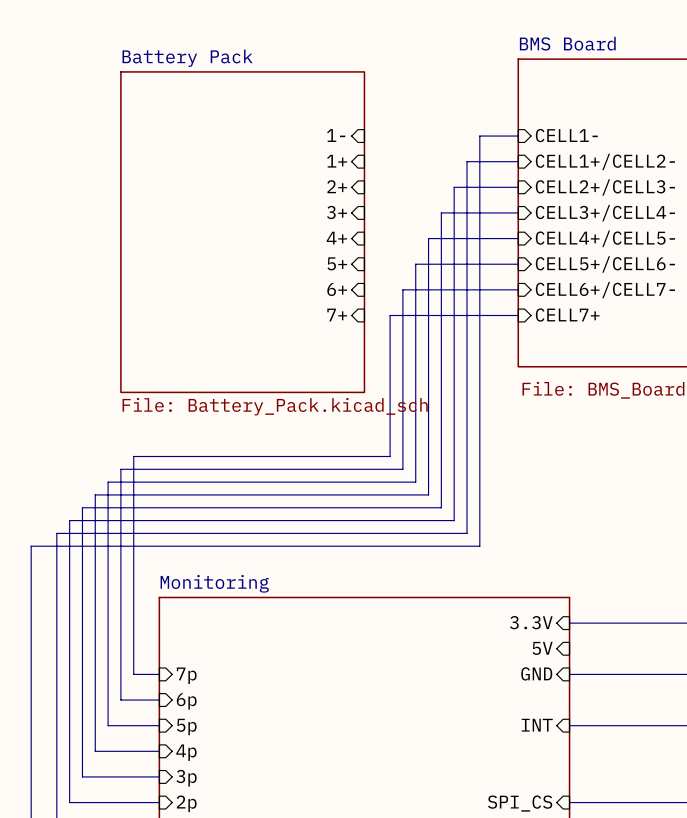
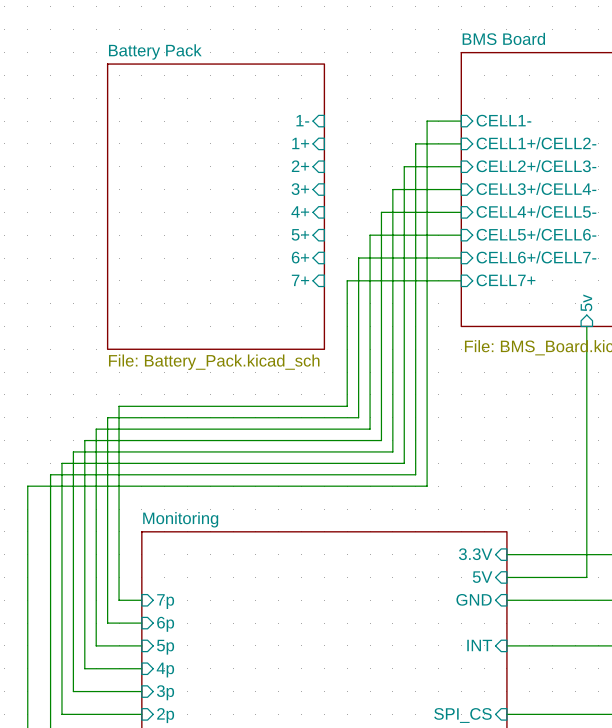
sheet pin: none -> 5v (586, 302)
wire: none -> (586, 326) (586, 577) (506, 577)

